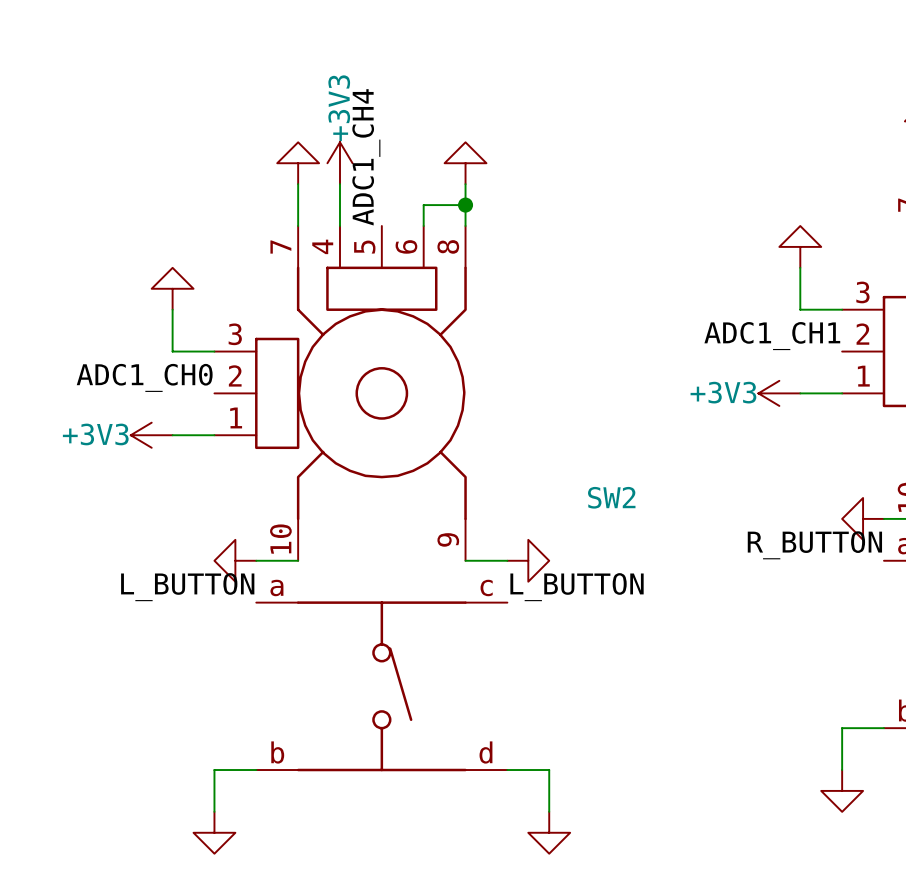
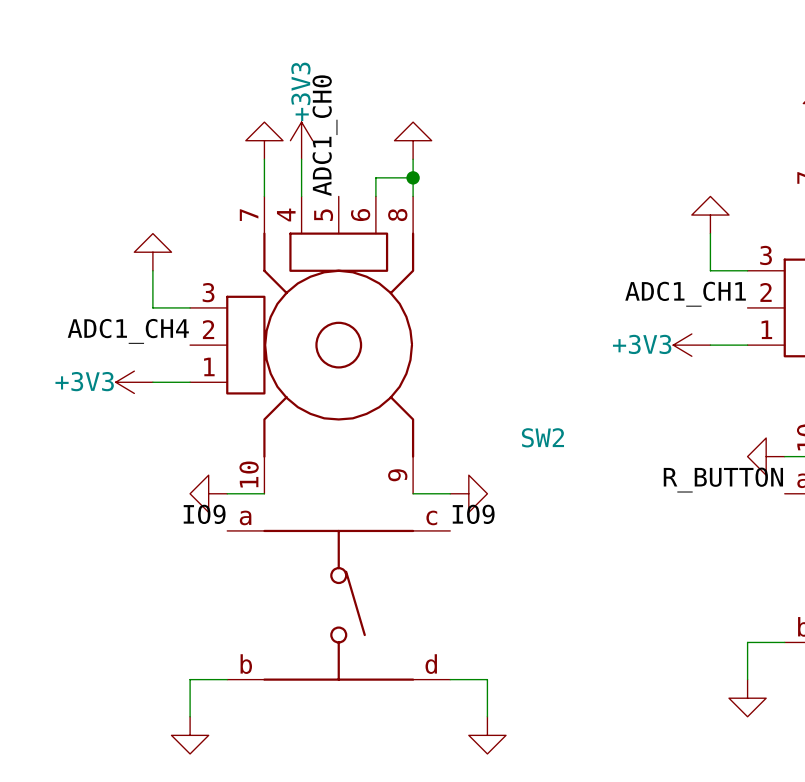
label: ADC1_CH4 (366, 157) -> ADC1_CH0 (325, 135)
label: ADC1_CH0 (144, 377) -> ADC1_CH4 (128, 331)
label: L_BUTTON (187, 587) -> IO9 (204, 514)
label: L_BUTTON (577, 587) -> IO9 (473, 514)

